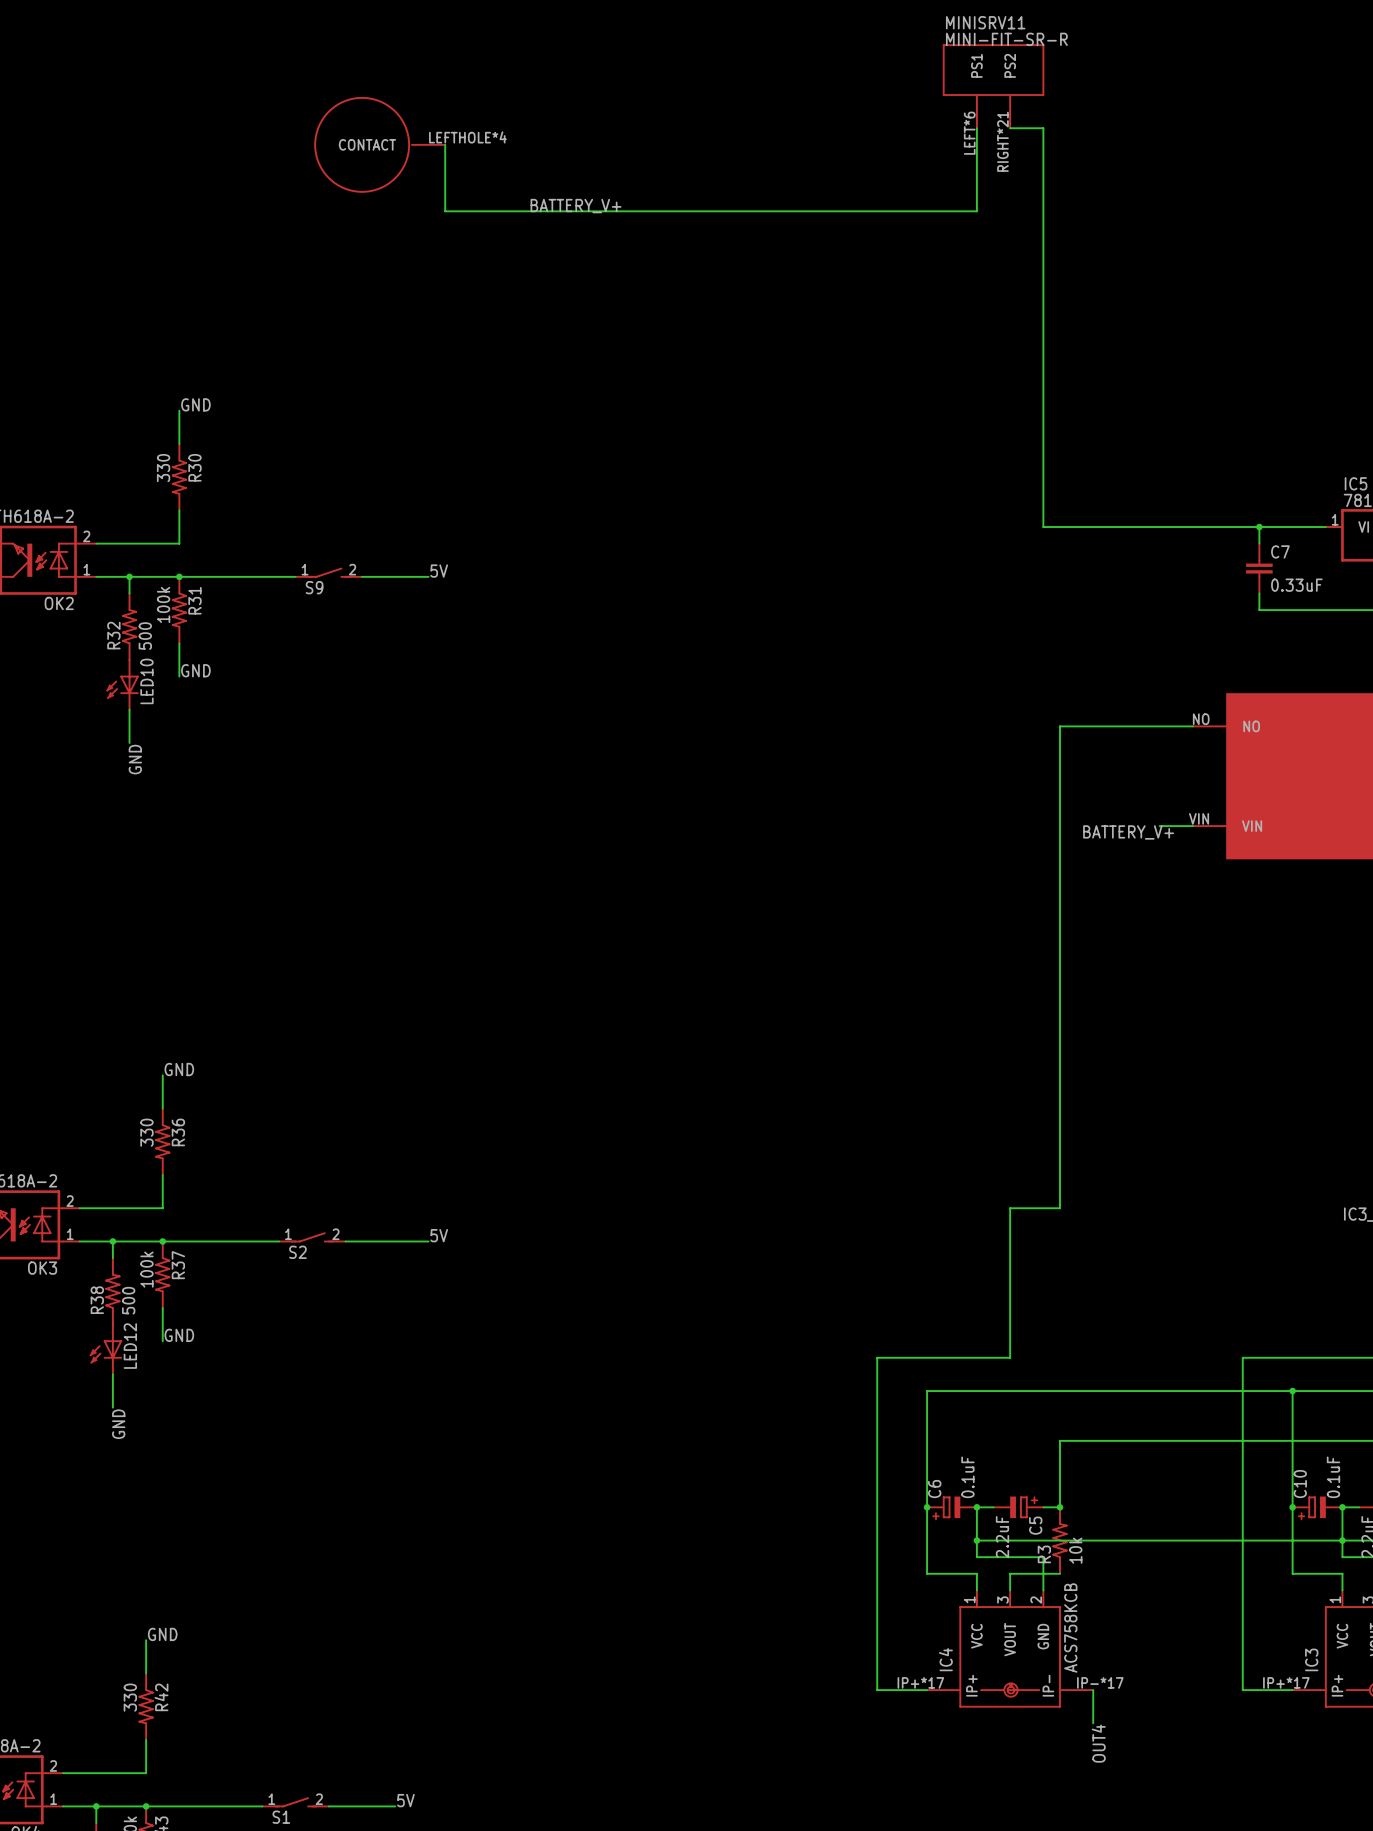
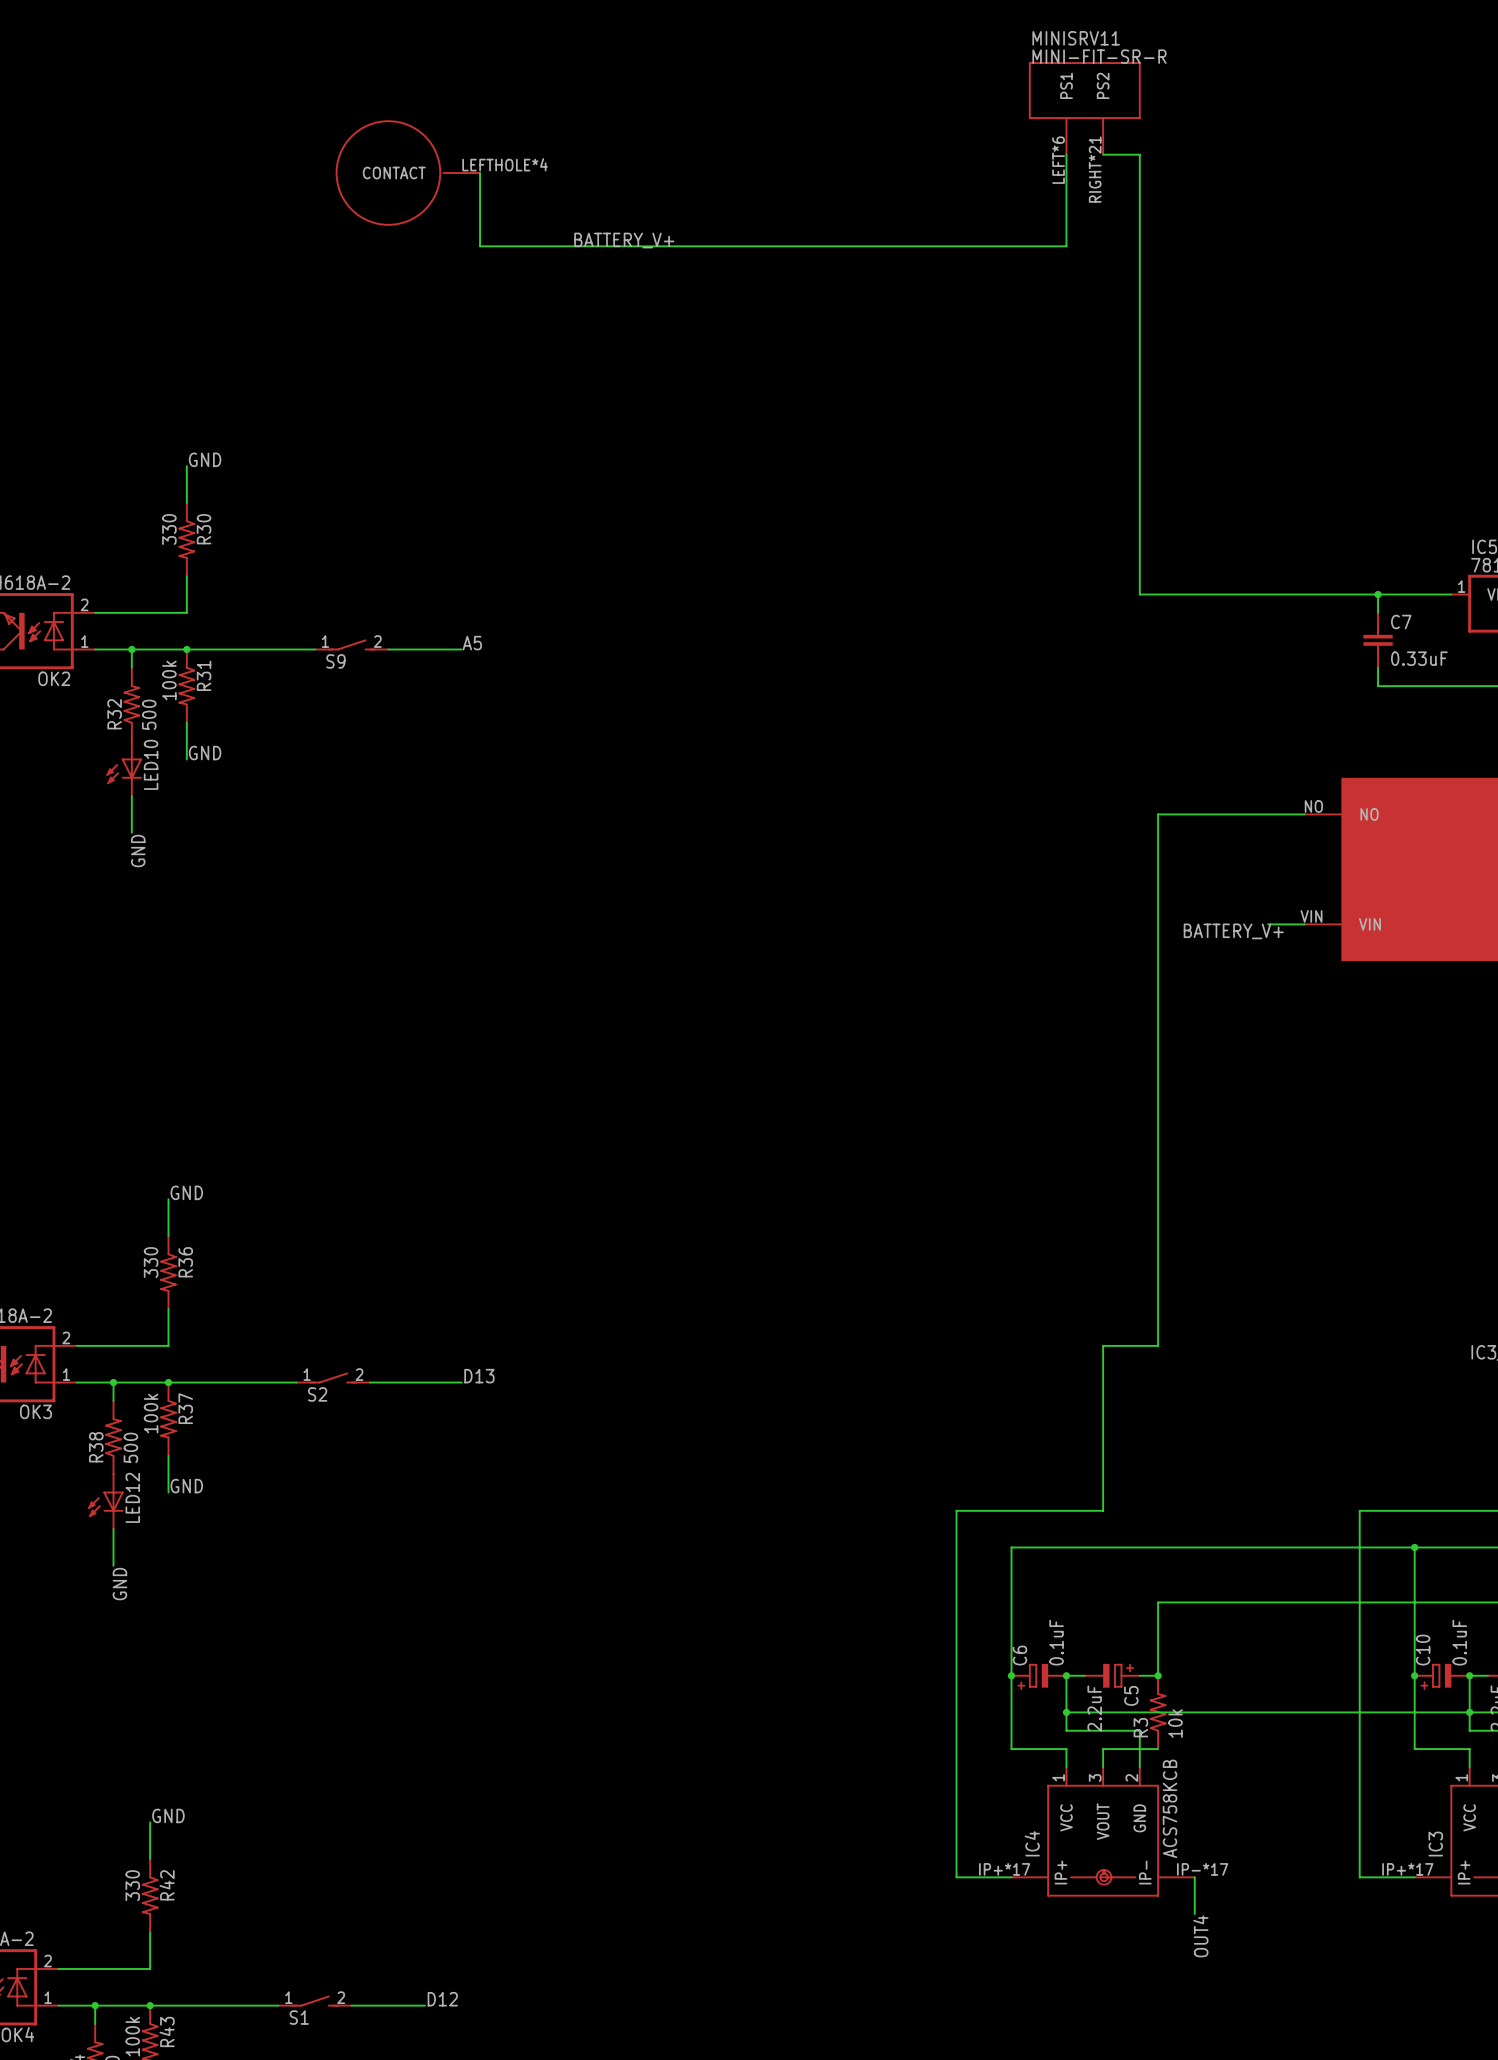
label: 5V (439, 571) -> A5 (472, 643)
label: 5V (439, 1235) -> D13 (479, 1376)
label: 5V (405, 1800) -> D12 (442, 1999)

